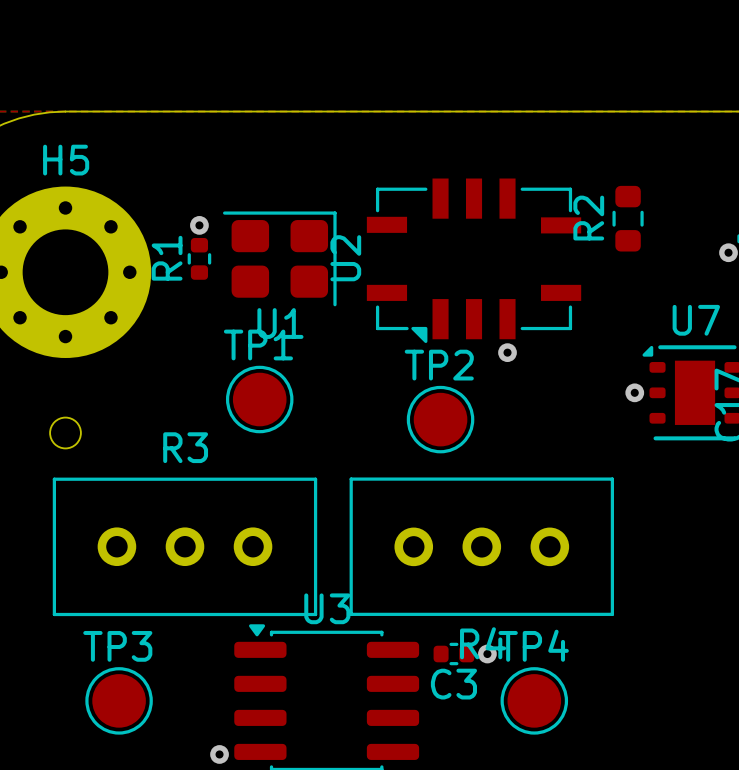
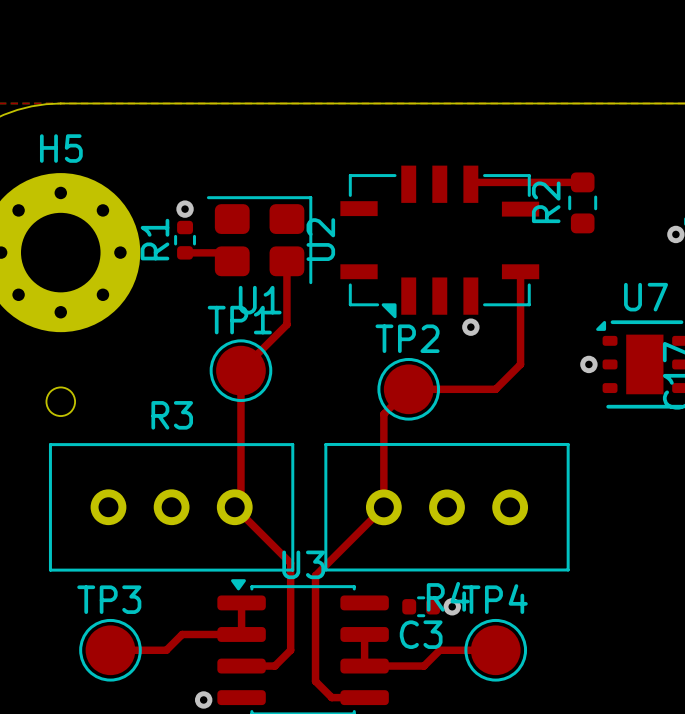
top track: none -> (582, 182) (472, 182) (470, 184)
top track: none -> (185, 252) (223, 252) (232, 261)
top track: none -> (286, 261) (286, 324) (240, 370) (240, 501) (234, 507) (290, 563) (290, 650) (274, 666) (241, 666)
top track: none -> (520, 271) (520, 364) (495, 389) (408, 389) (383, 414) (383, 507) (315, 575) (315, 681) (331, 697) (364, 697)
top track: none -> (241, 602) (241, 634) (182, 634) (166, 650) (110, 650)
top track: none -> (364, 634) (364, 666) (424, 666) (439, 650) (495, 650)

